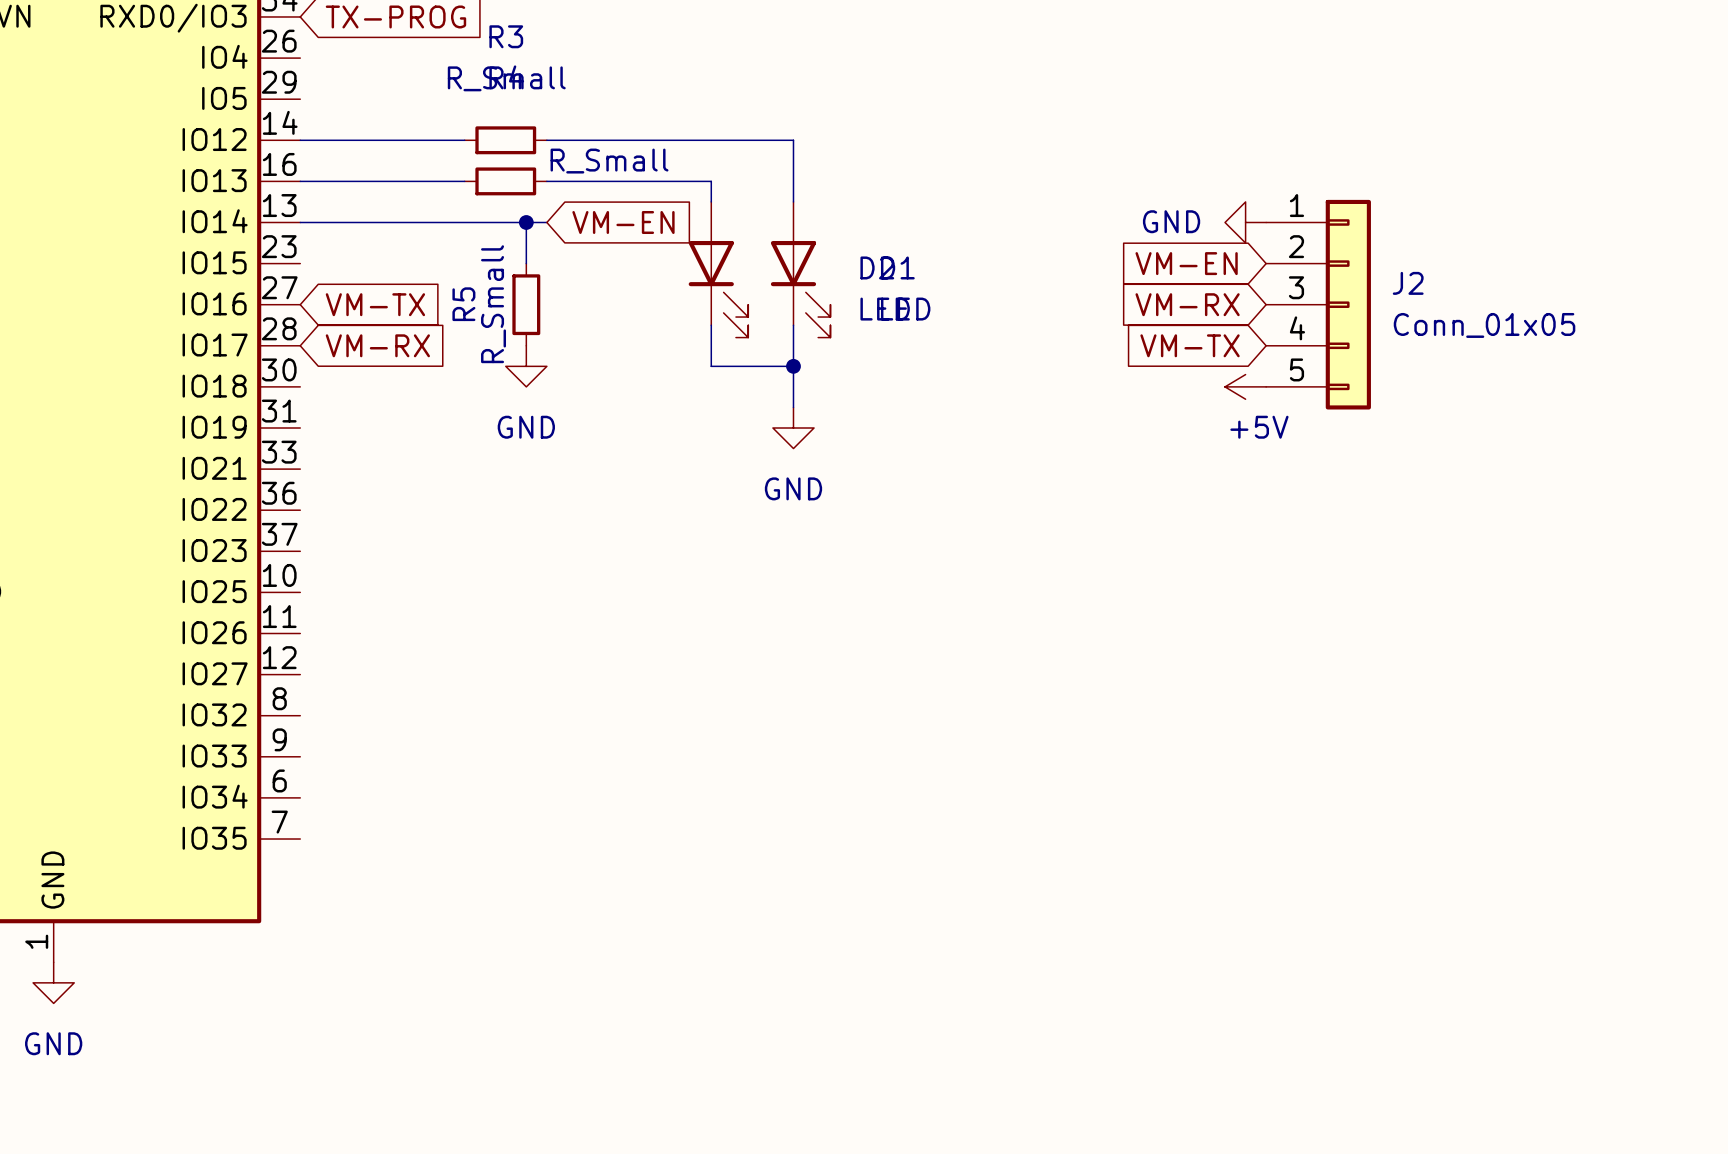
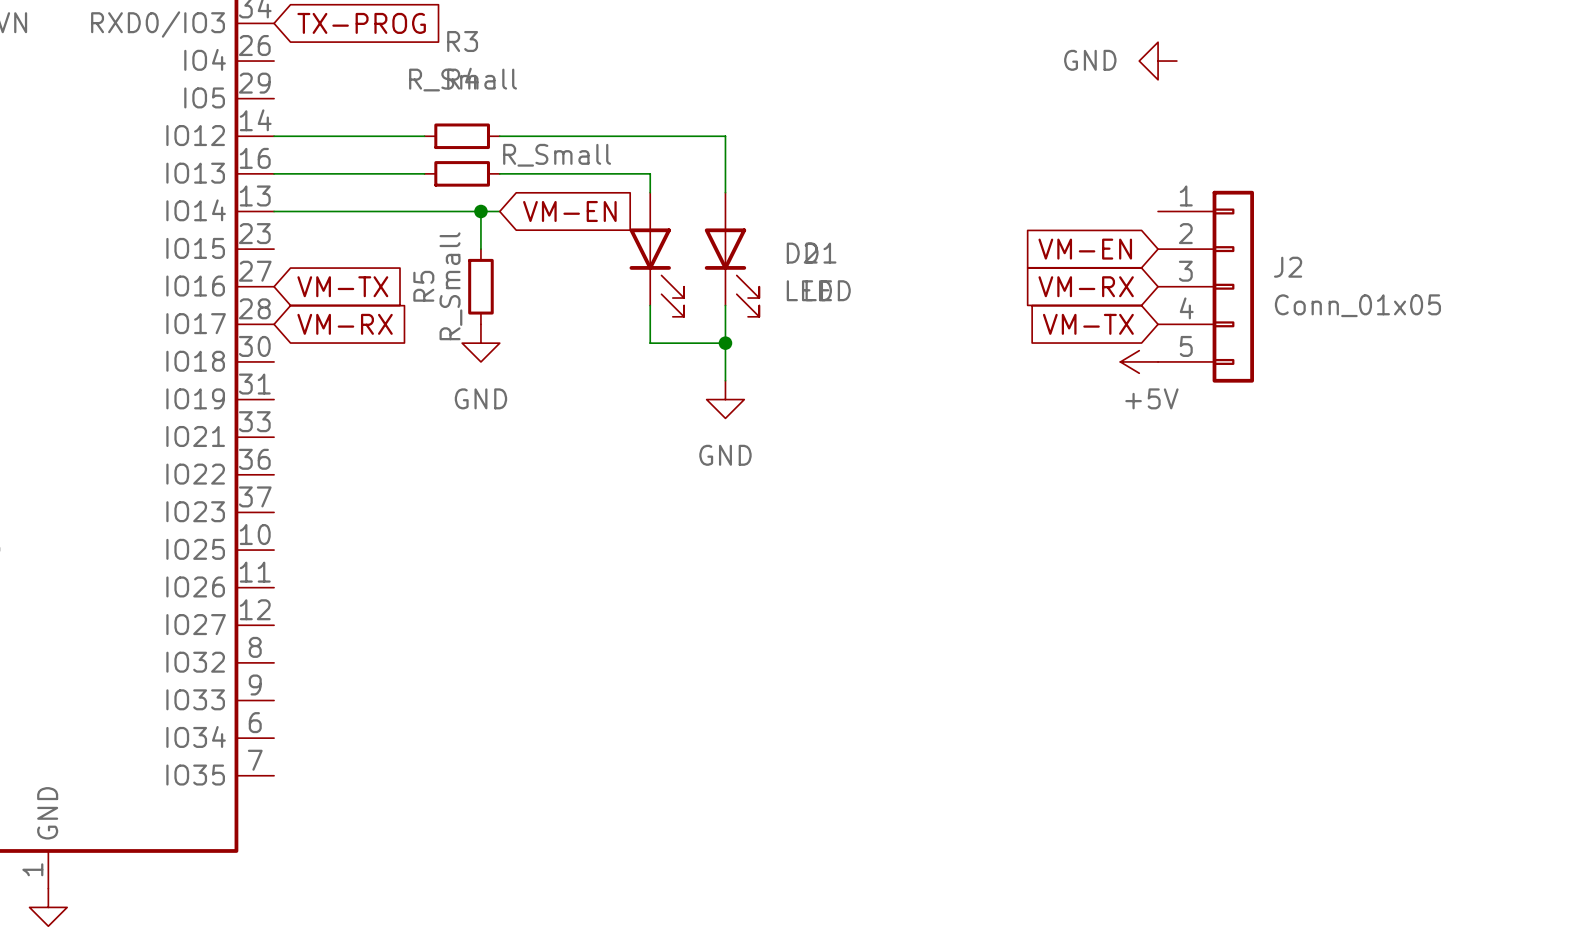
power symbol position: GND (1245, 222) -> GND (1158, 61)

